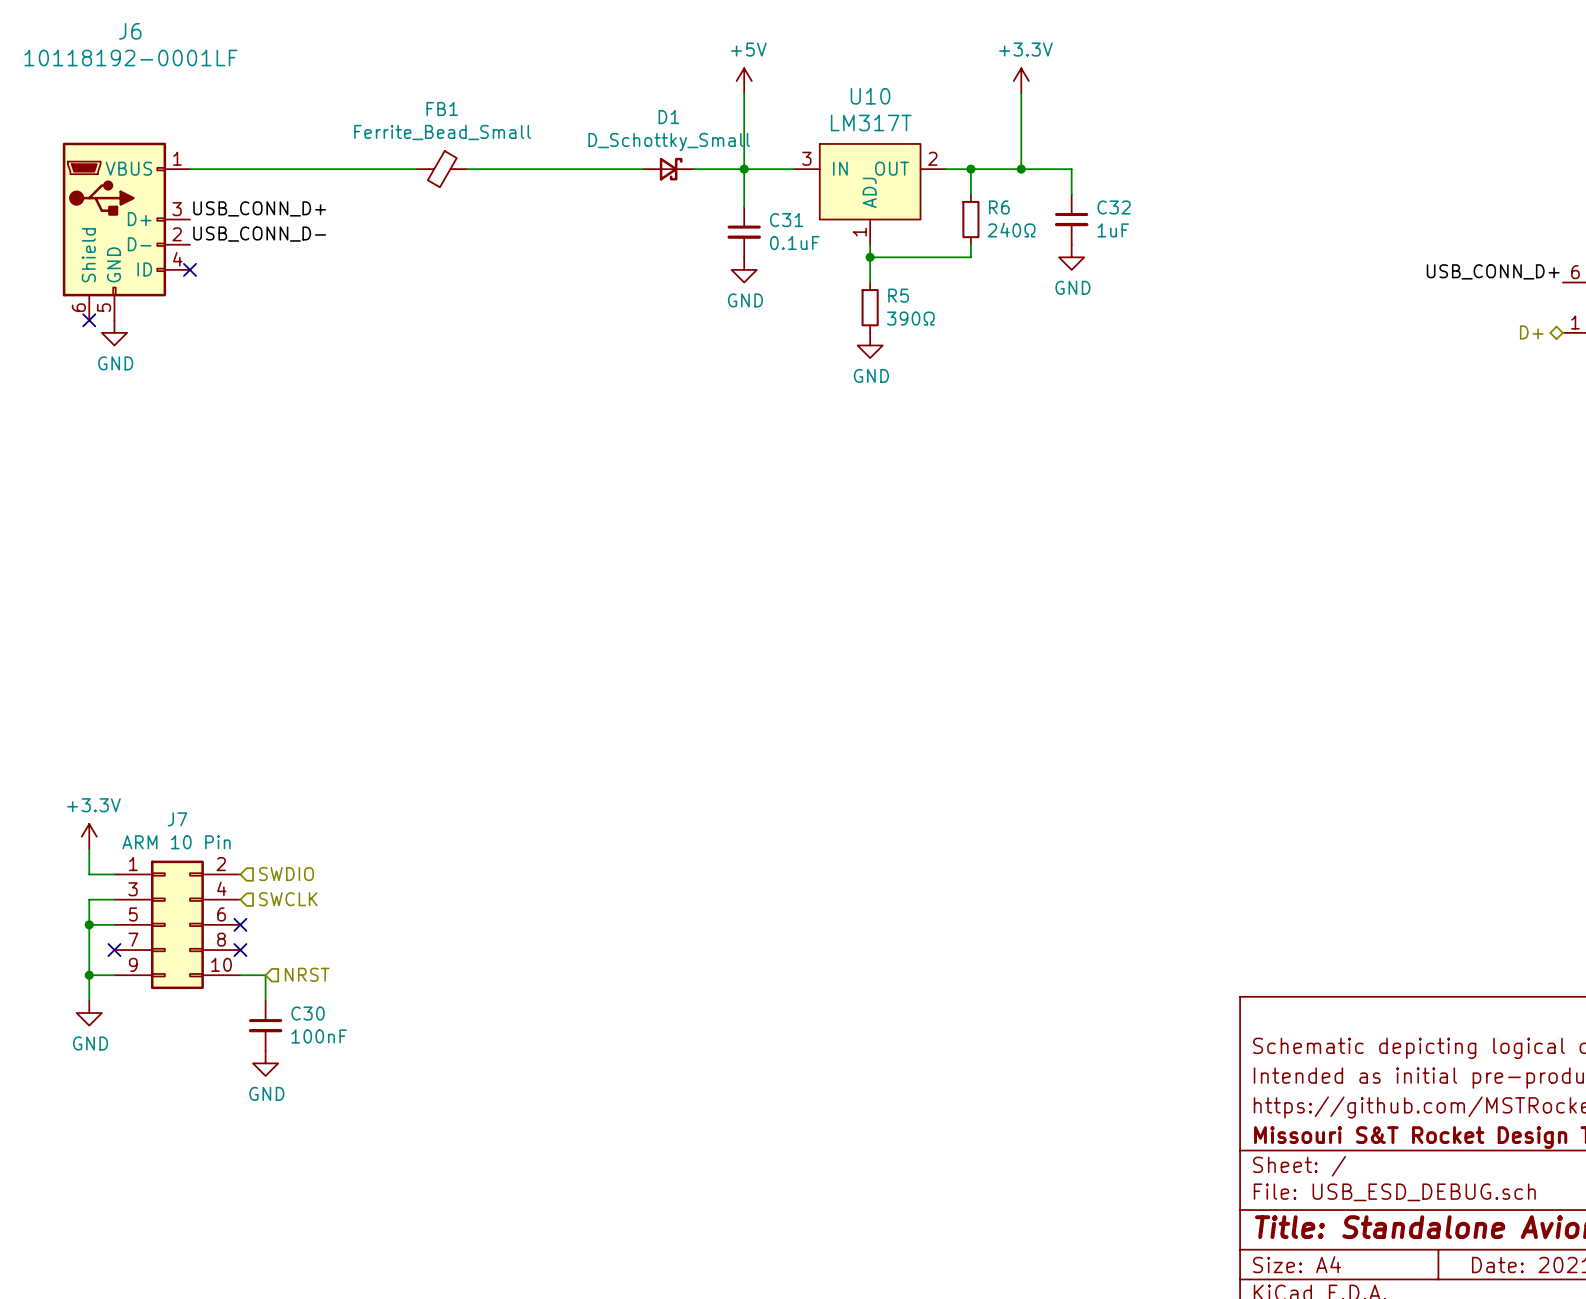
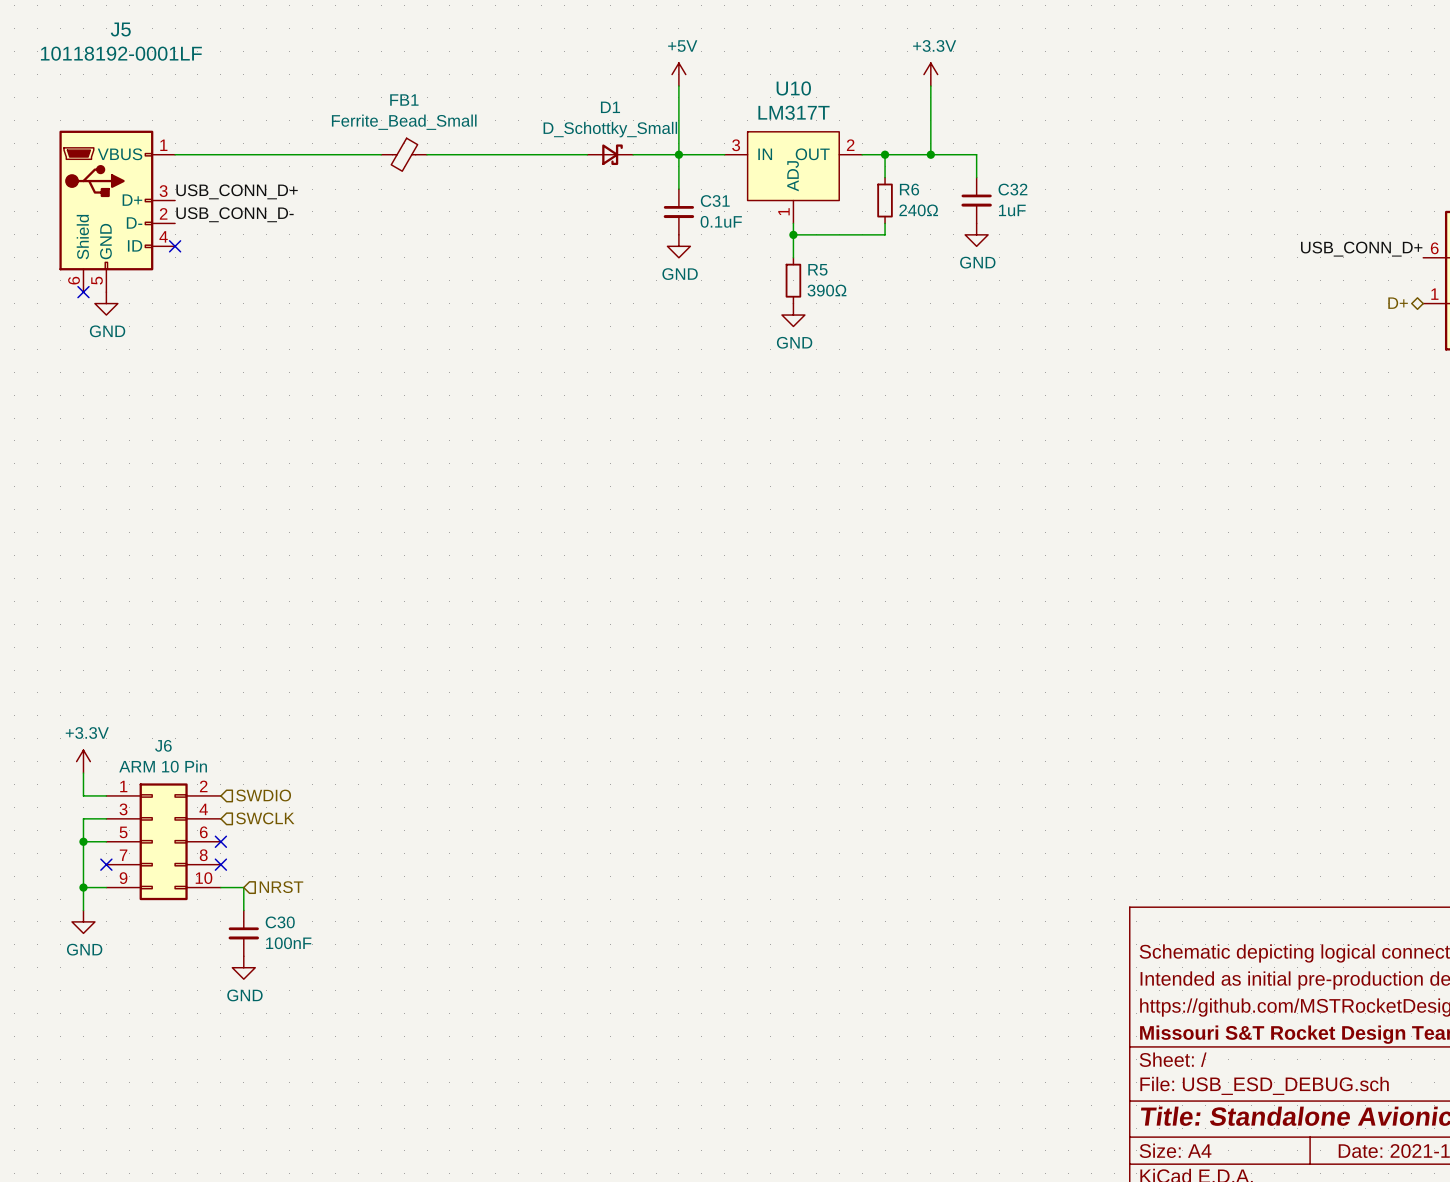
J6 name: J6 (130, 31) -> J5 (120, 29)
J7 name: J7 (177, 819) -> J6 (163, 745)

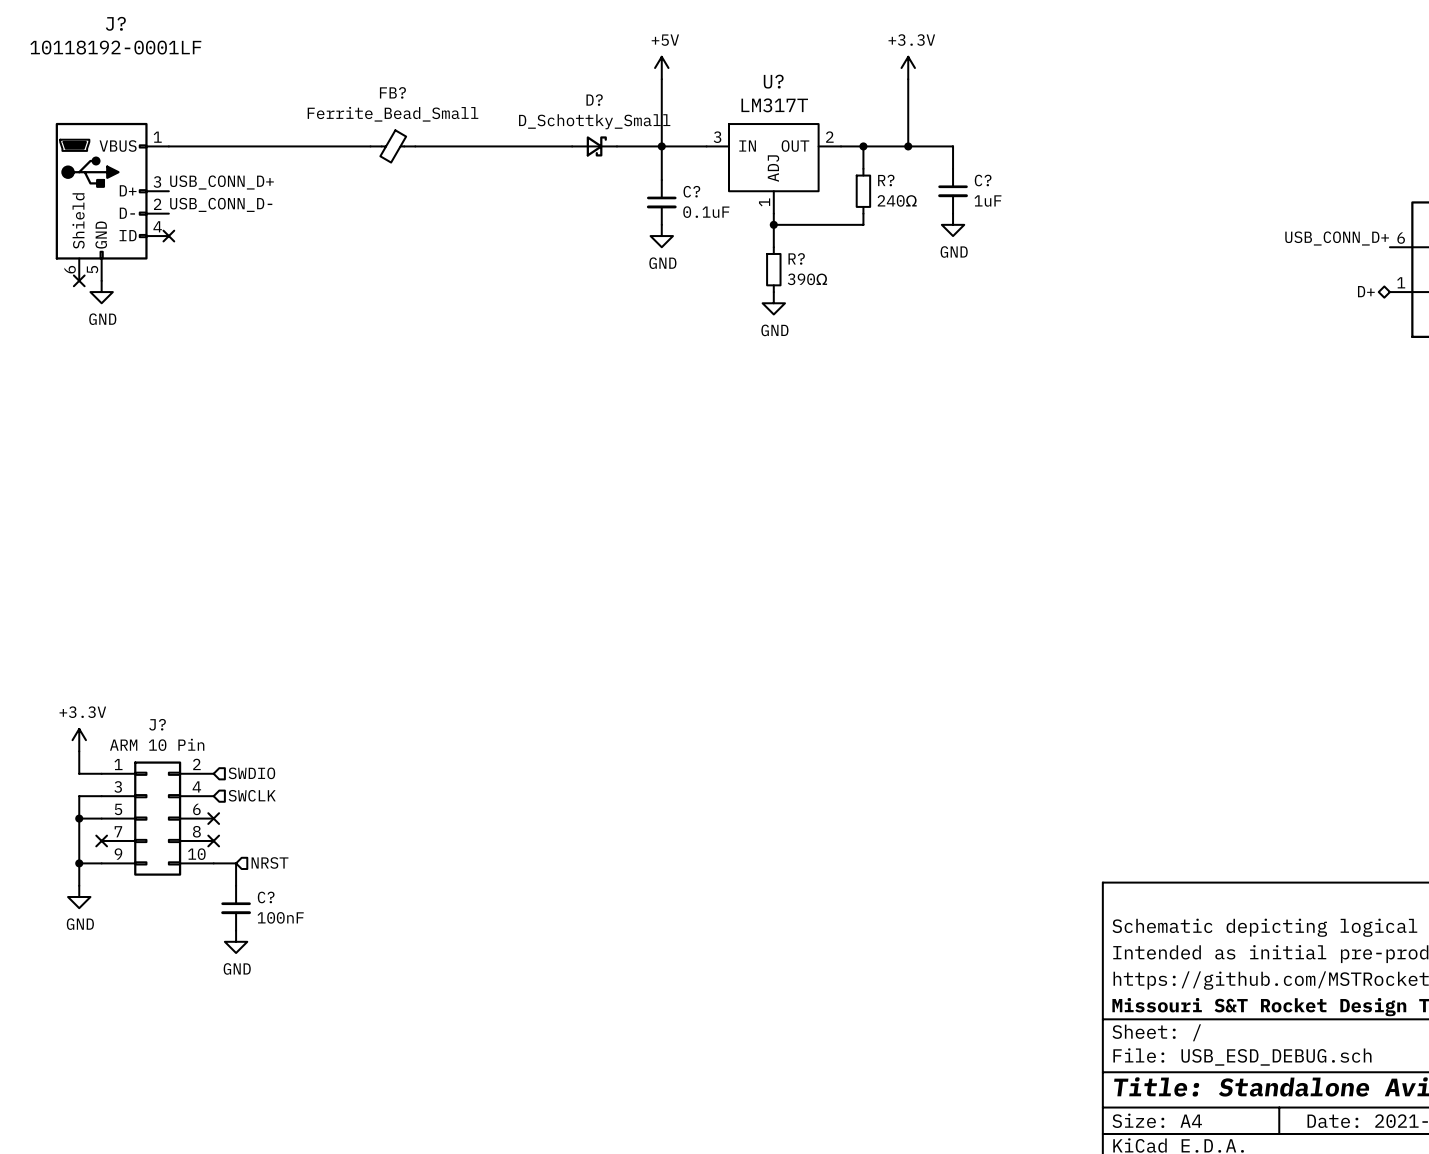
J5 name: J5 (120, 29) -> J? (115, 23)
U10 name: U10 (793, 88) -> U? (773, 81)
FB1 name: FB1 (404, 100) -> FB? (392, 92)
D1 name: D1 (610, 107) -> D? (594, 100)
R6 name: R6 (909, 189) -> R? (886, 180)
C32 name: C32 (1012, 189) -> C? (983, 180)
C31 name: C31 (715, 201) -> C? (691, 191)
R5 name: R5 (817, 269) -> R? (796, 258)
J6 name: J6 (163, 745) -> J? (157, 724)
C30 name: C30 (280, 922) -> C? (266, 897)

